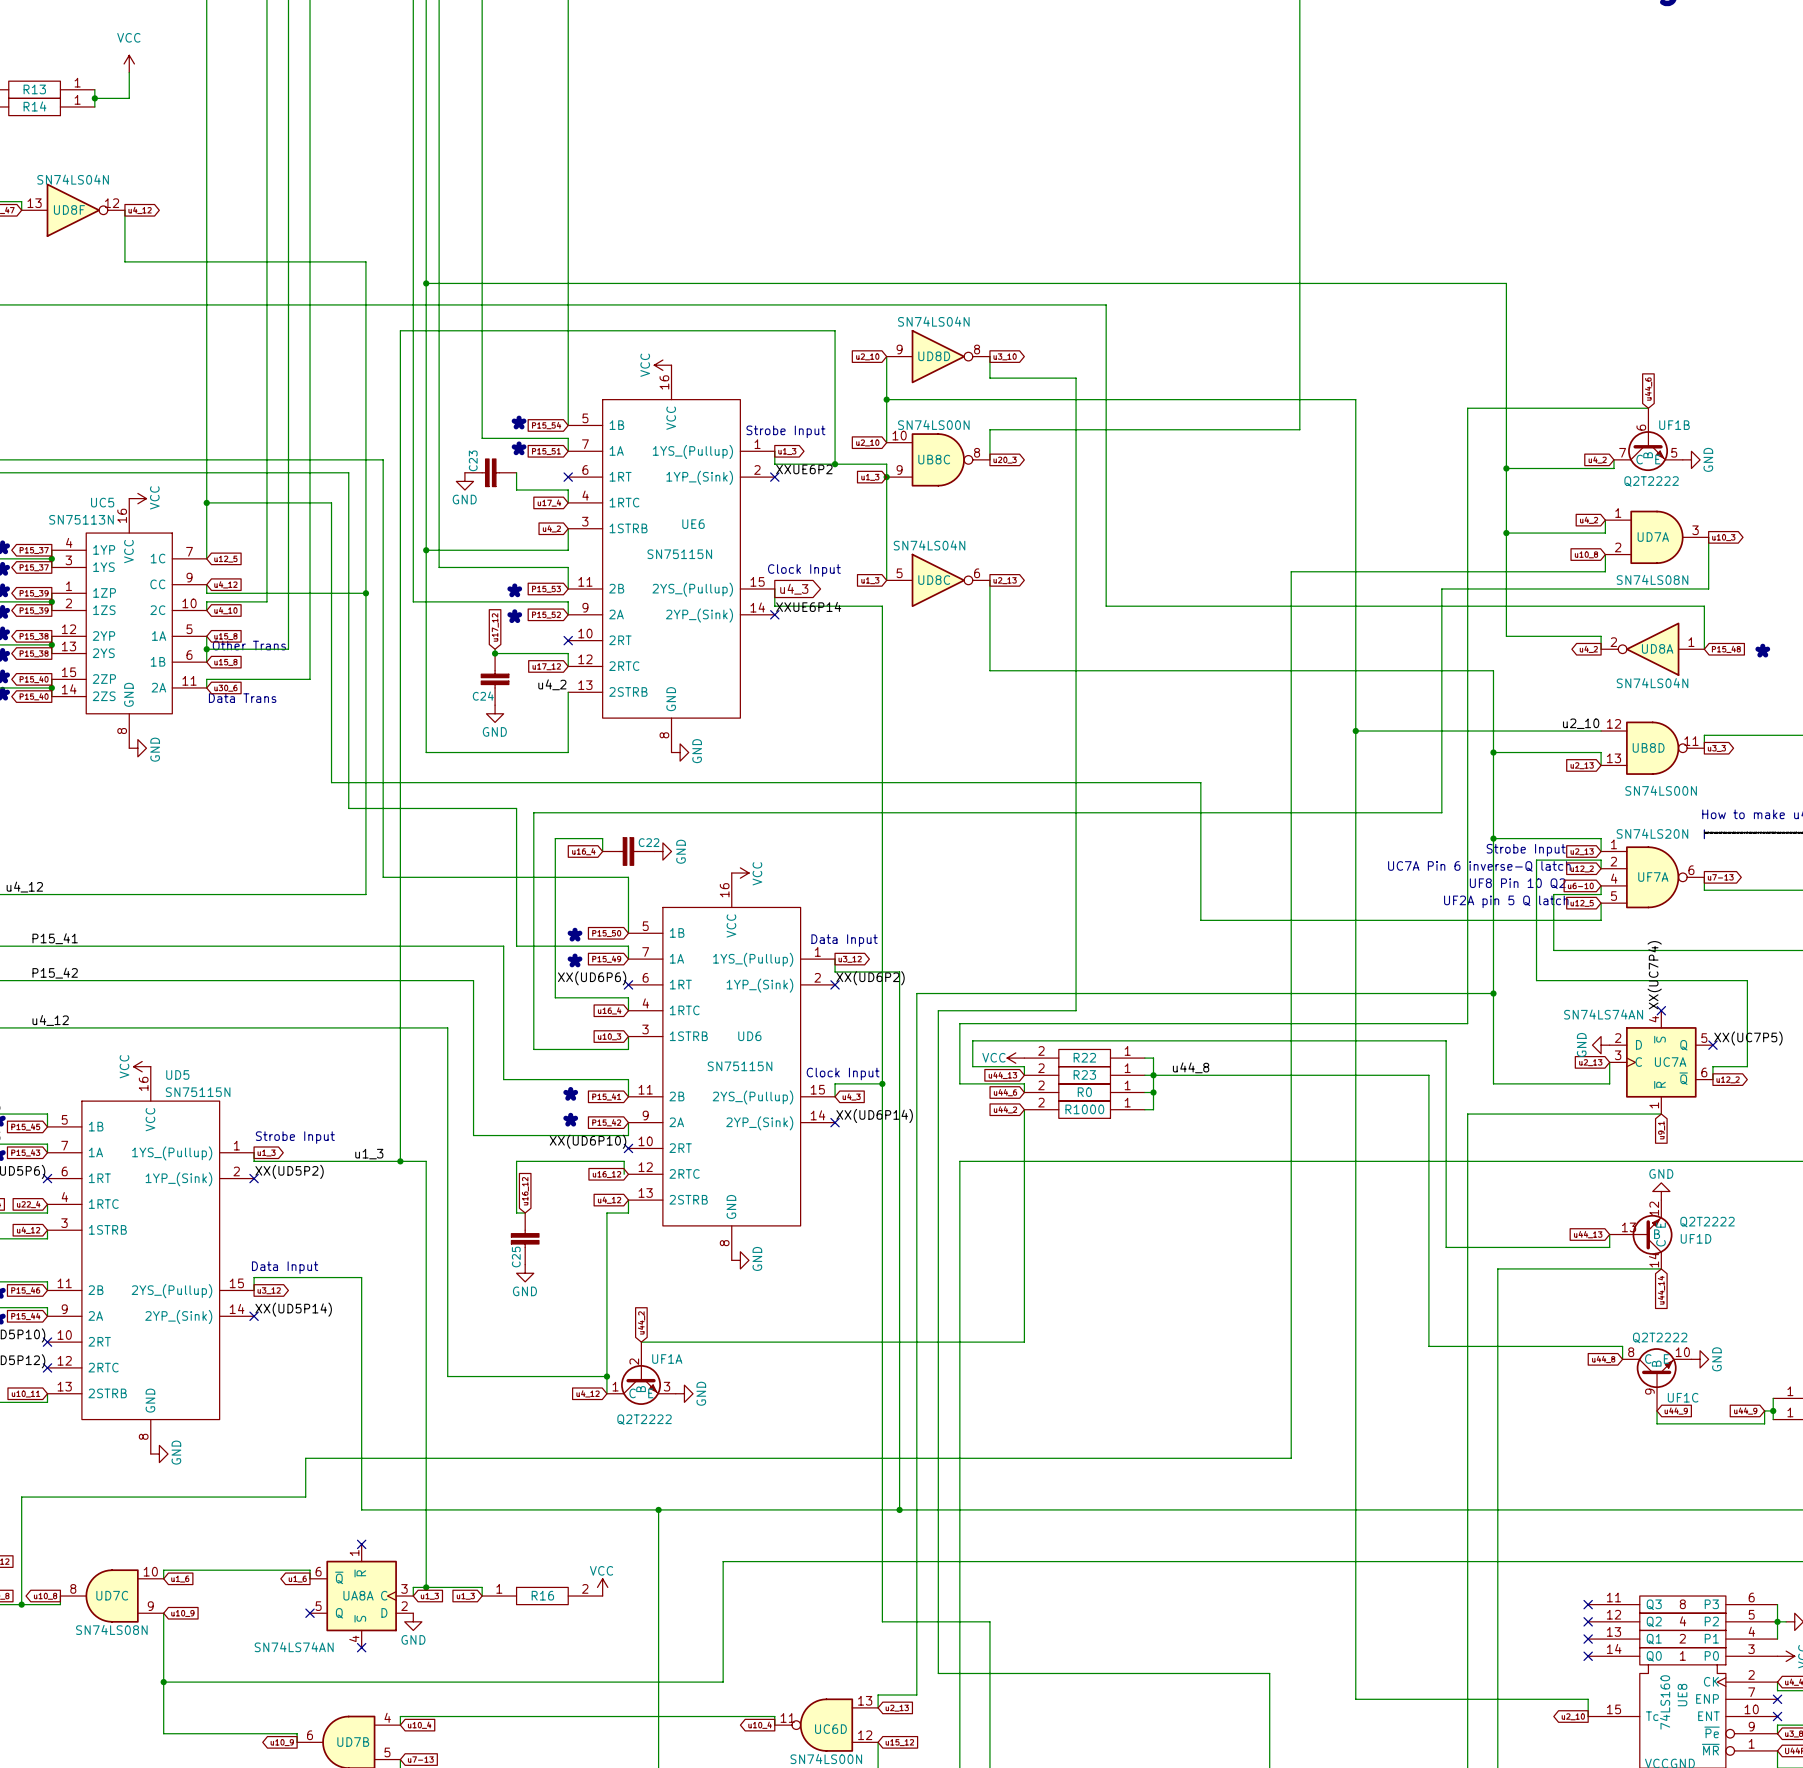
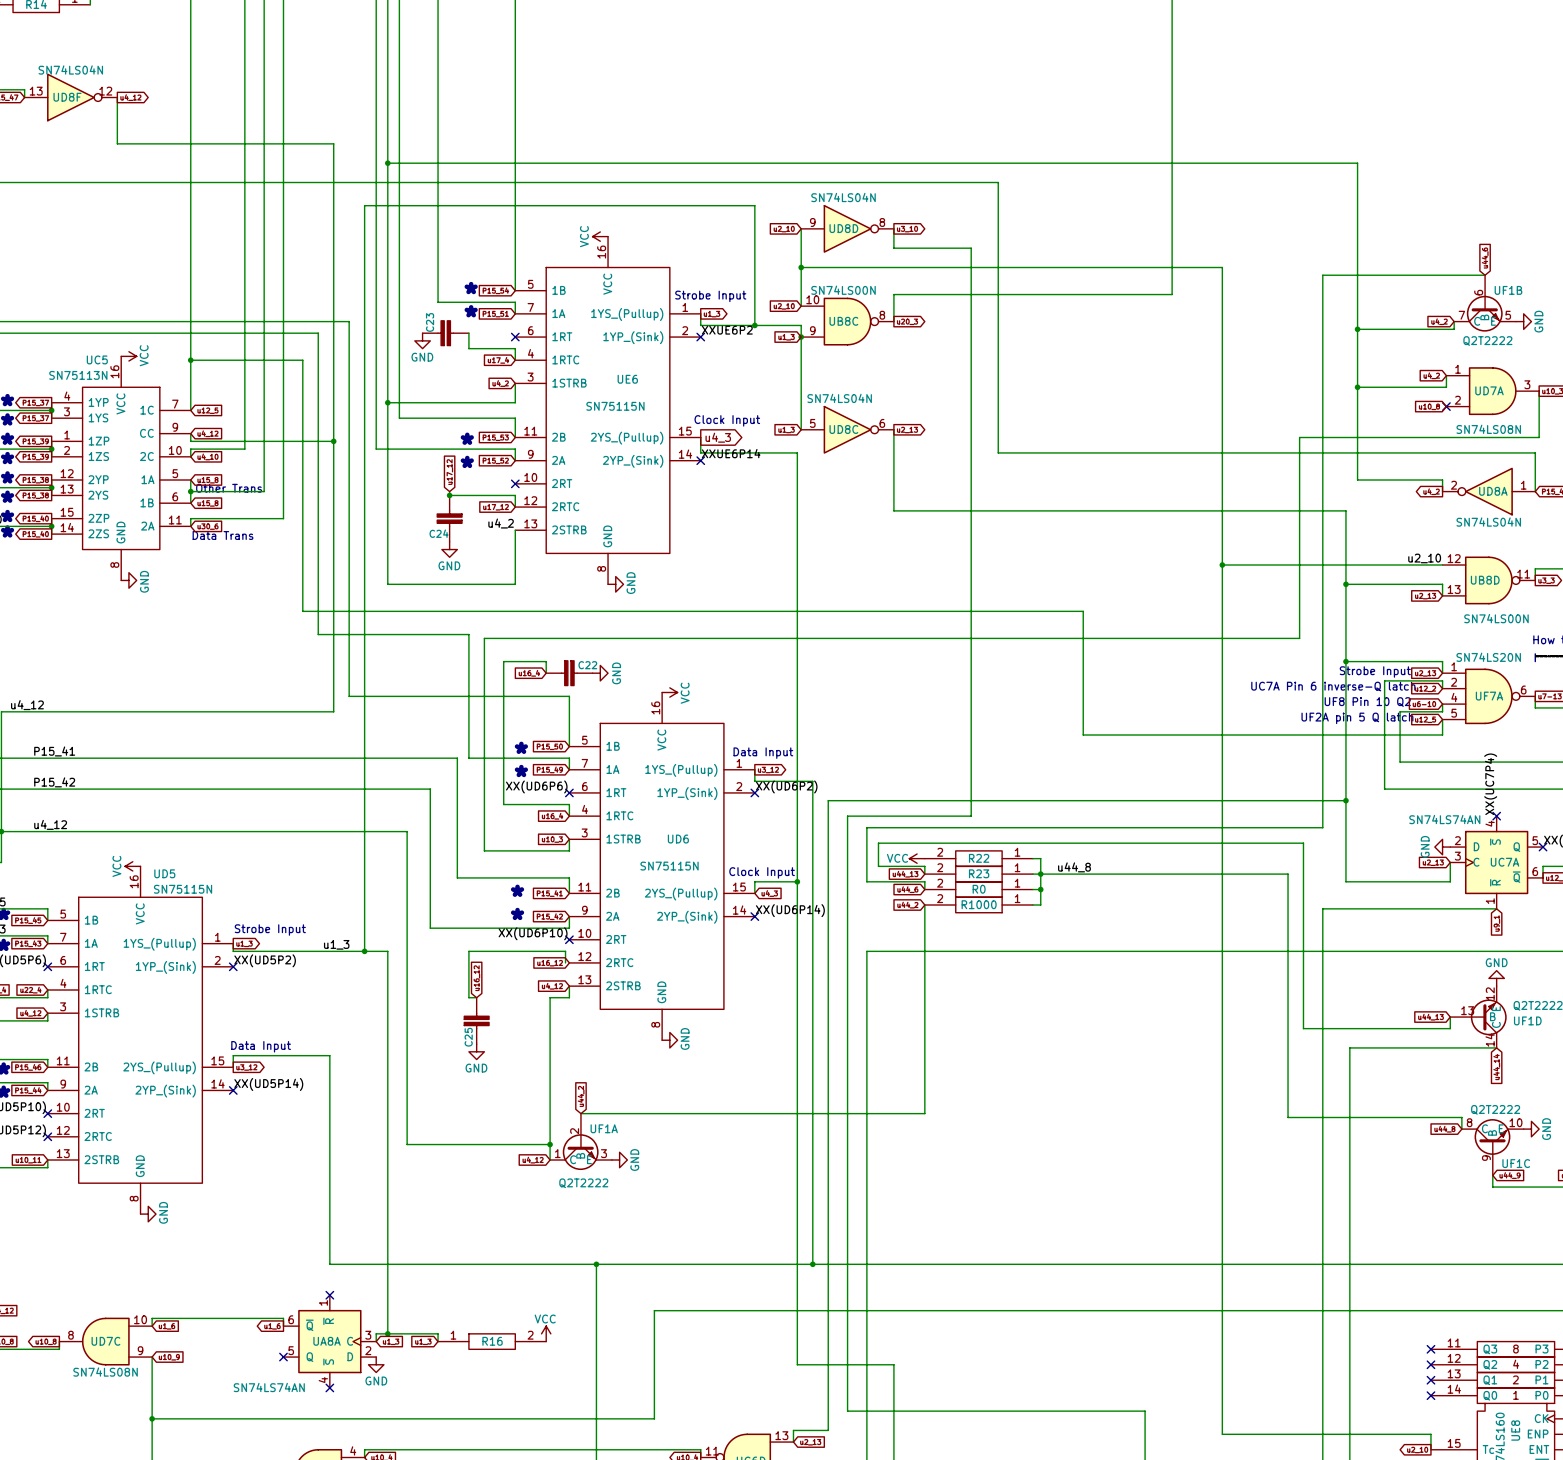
wire: (1605, 554) (1605, 571) (1291, 571) (1291, 1458) (305, 1458) (305, 1497) (21, 1497) (21, 1604) -> none
no-connect mark: none -> (1446, 406)
junction: (21, 1604) -> none

